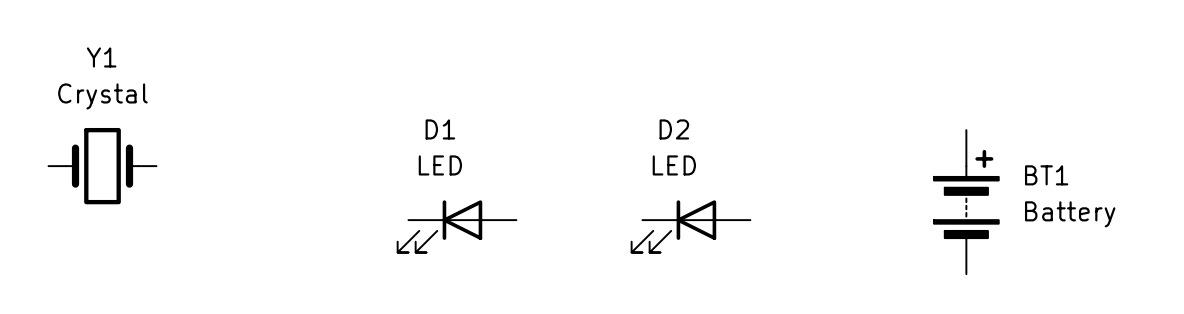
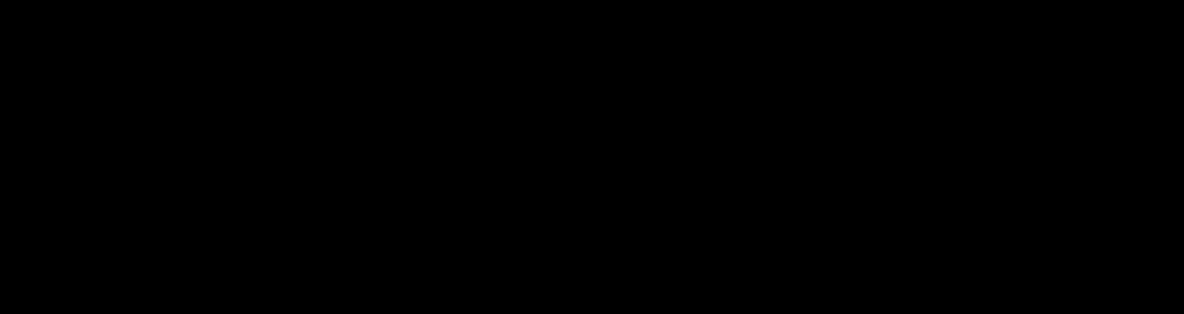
Y1: Crystal (102, 166) -> none
BT1: Battery (966, 202) -> none
D1: LED (457, 226) -> none
D2: LED (691, 226) -> none

